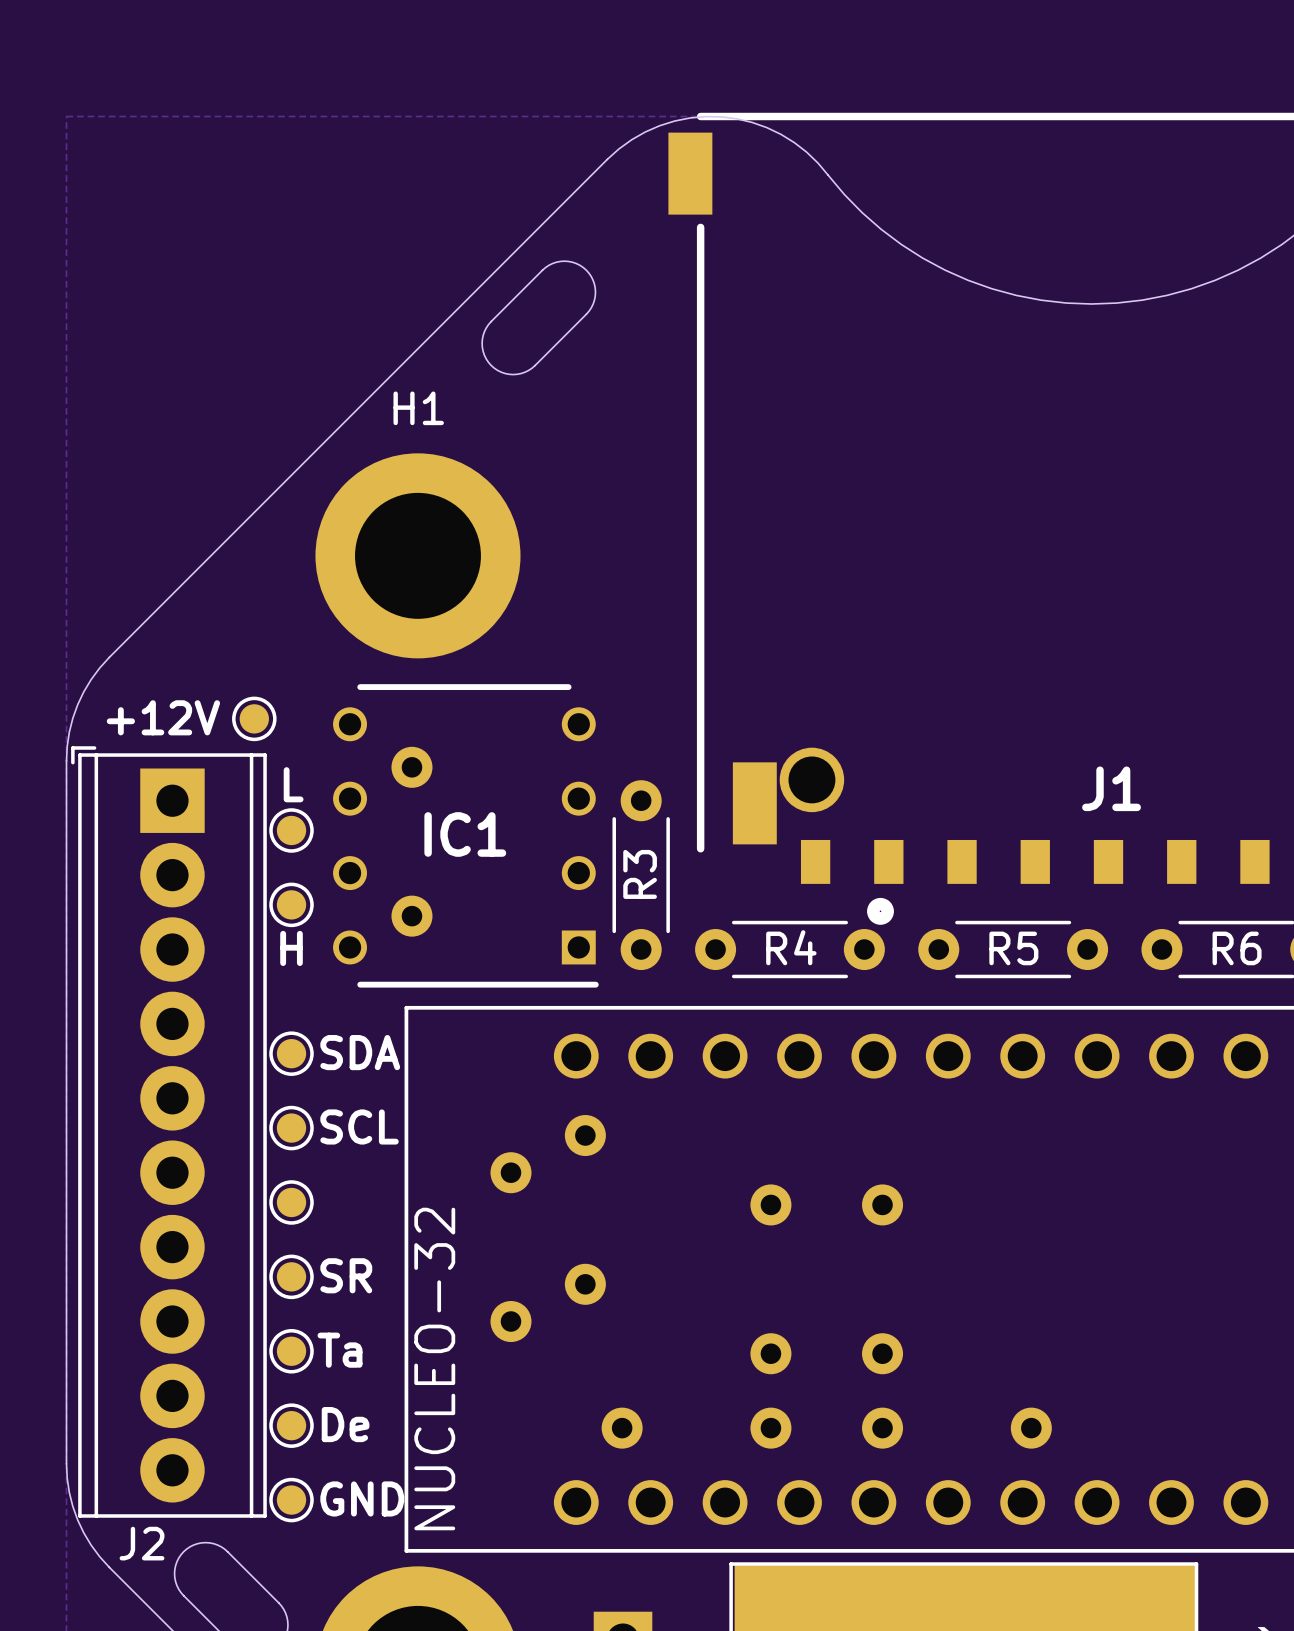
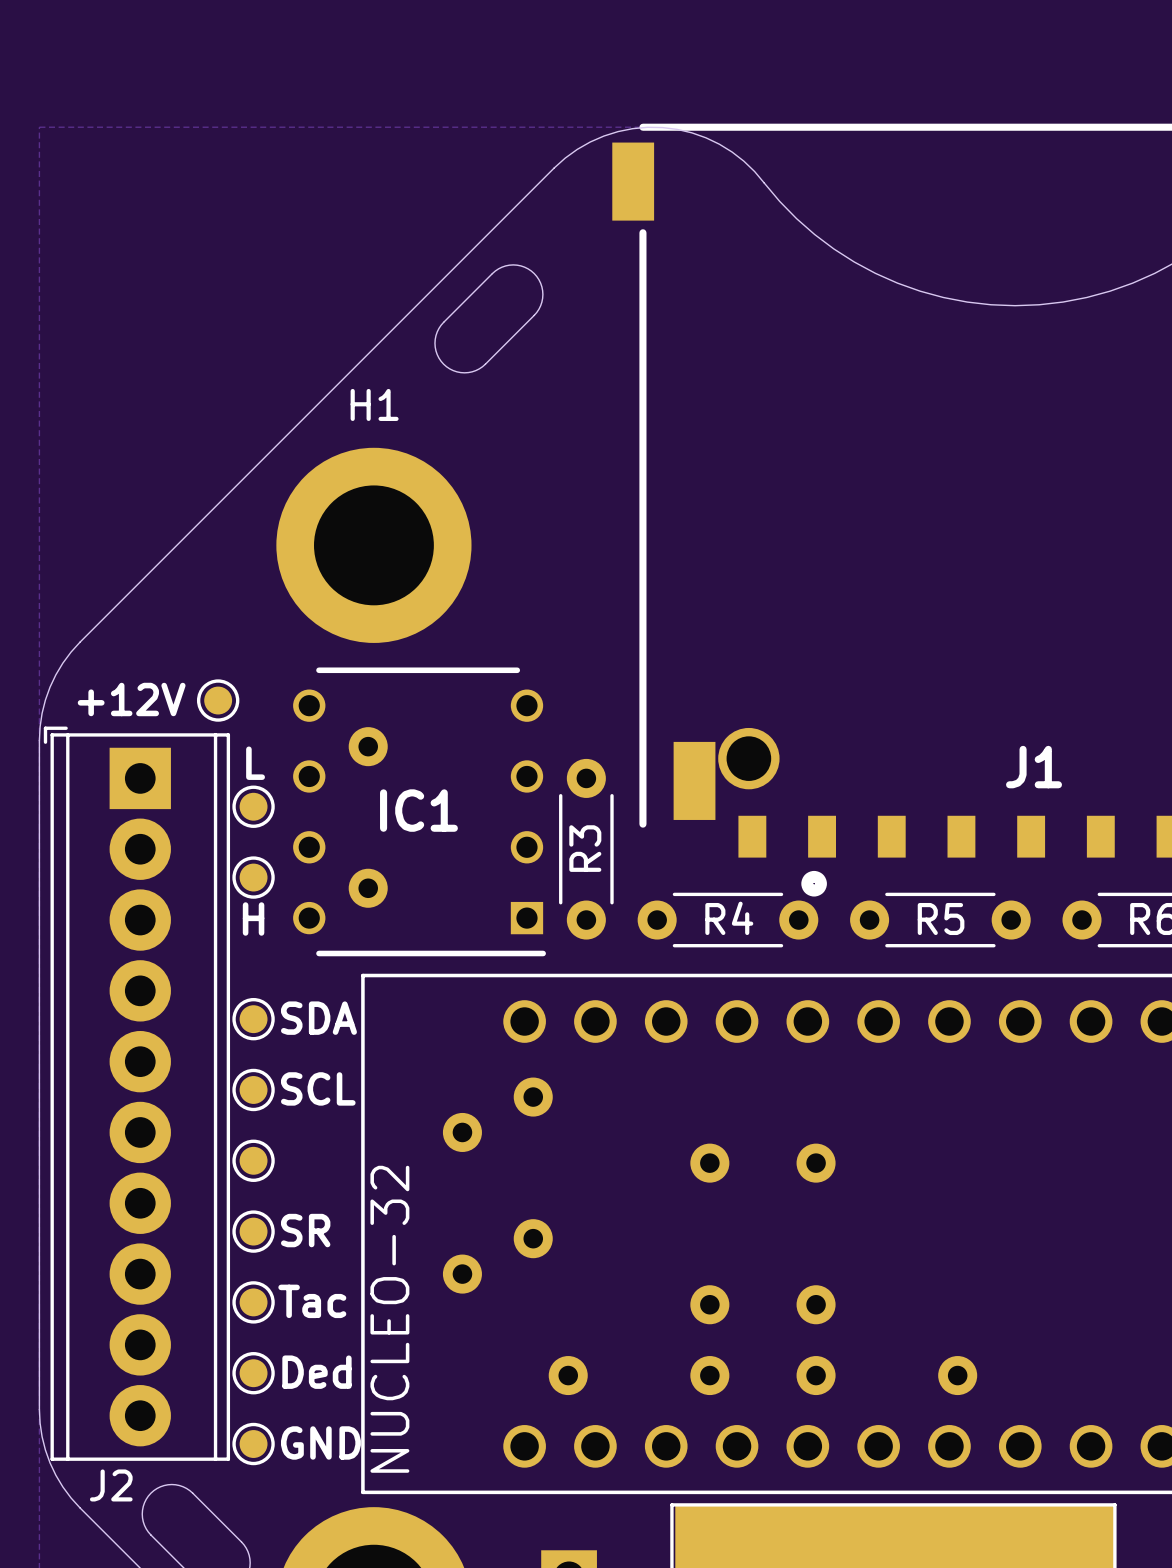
text: Ta (340, 1350) -> Tac (312, 1301)
text: De (345, 1424) -> Ded (316, 1372)

